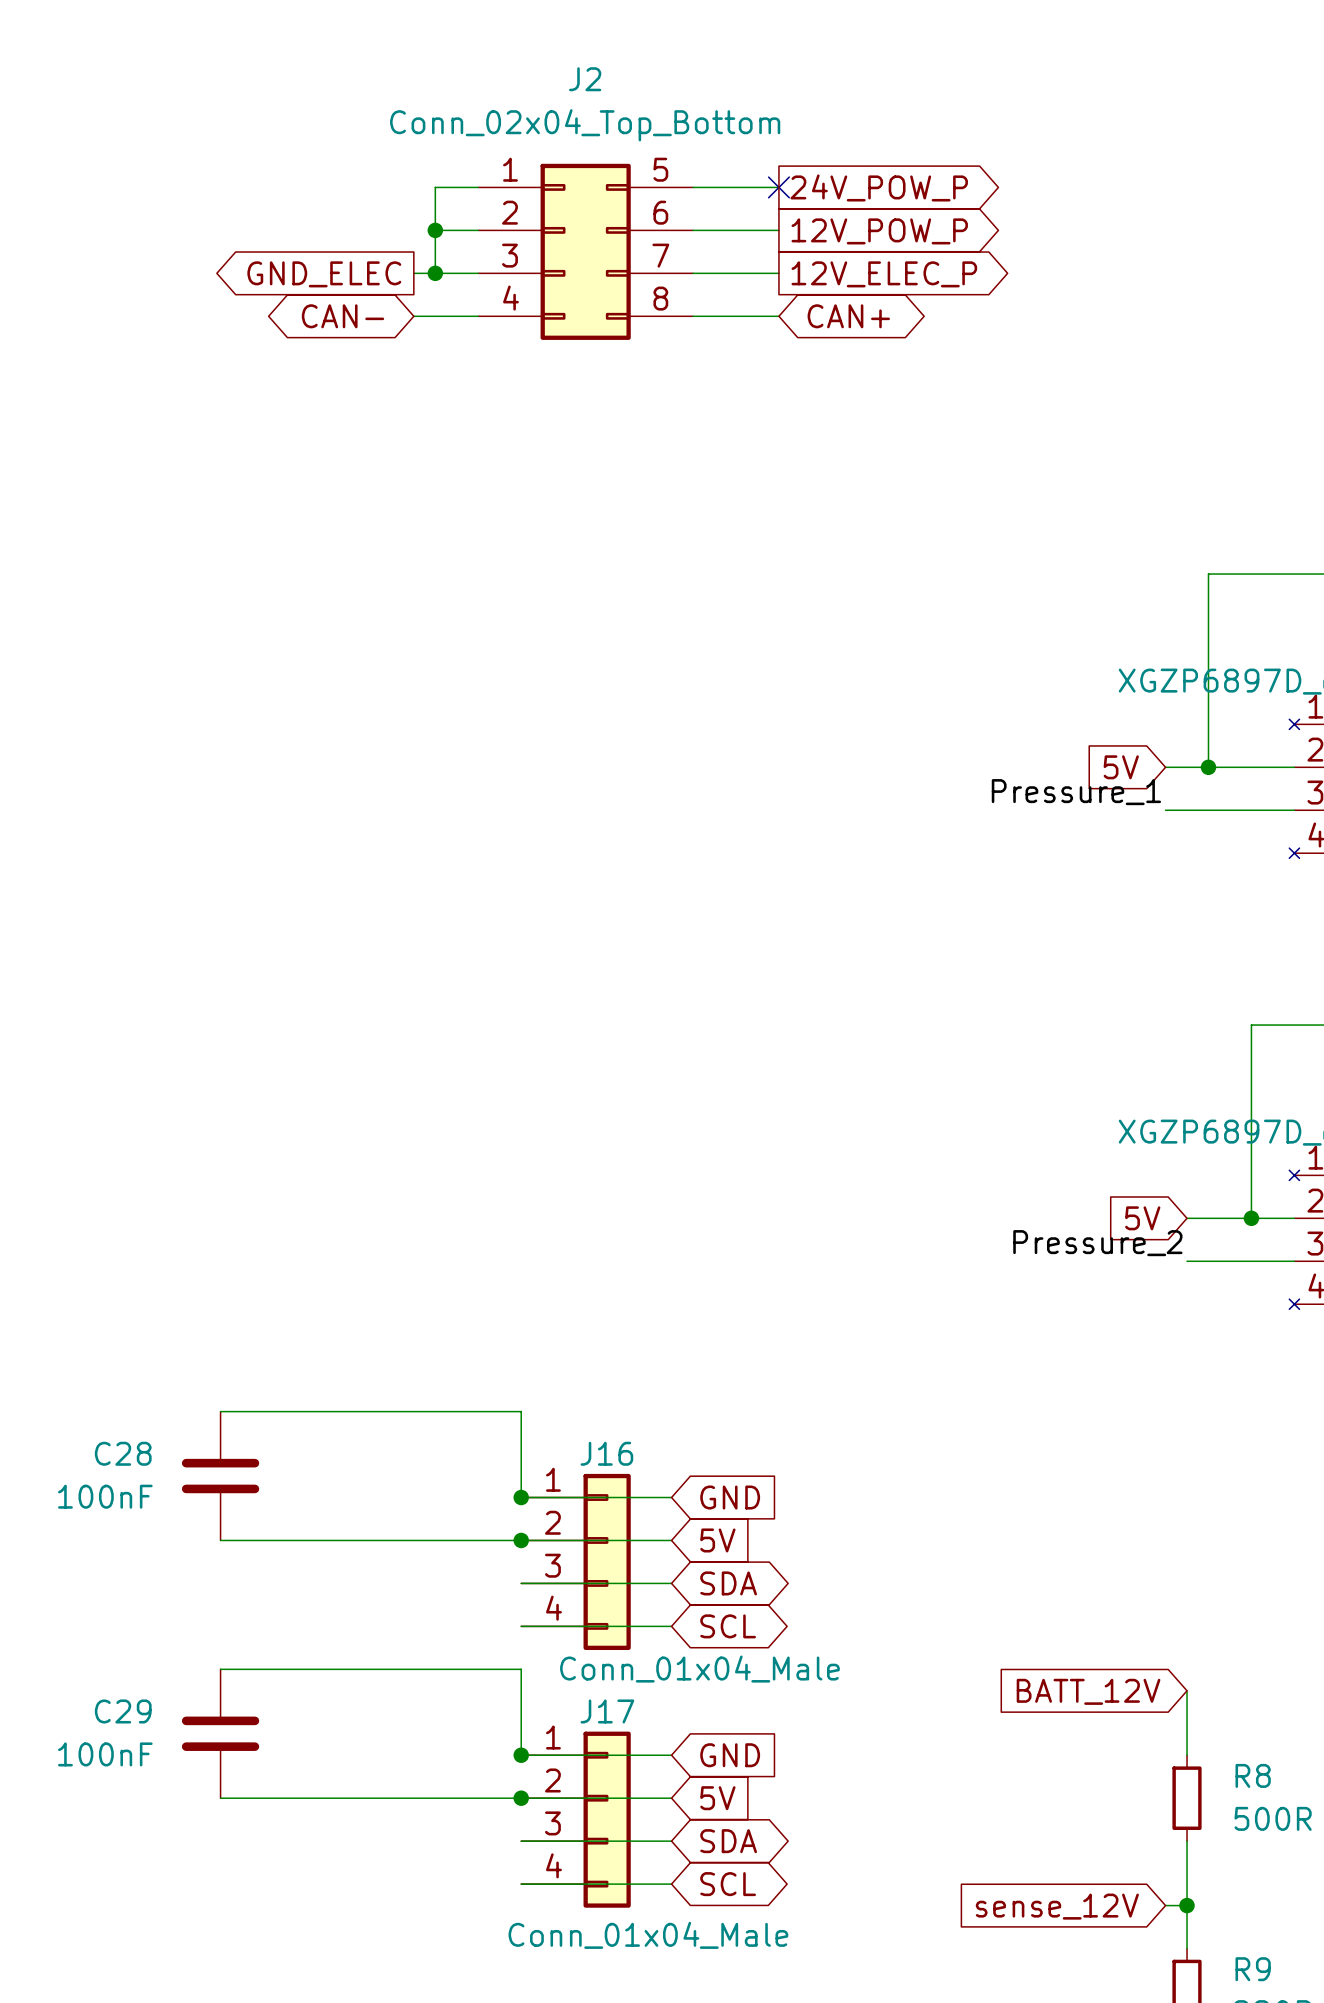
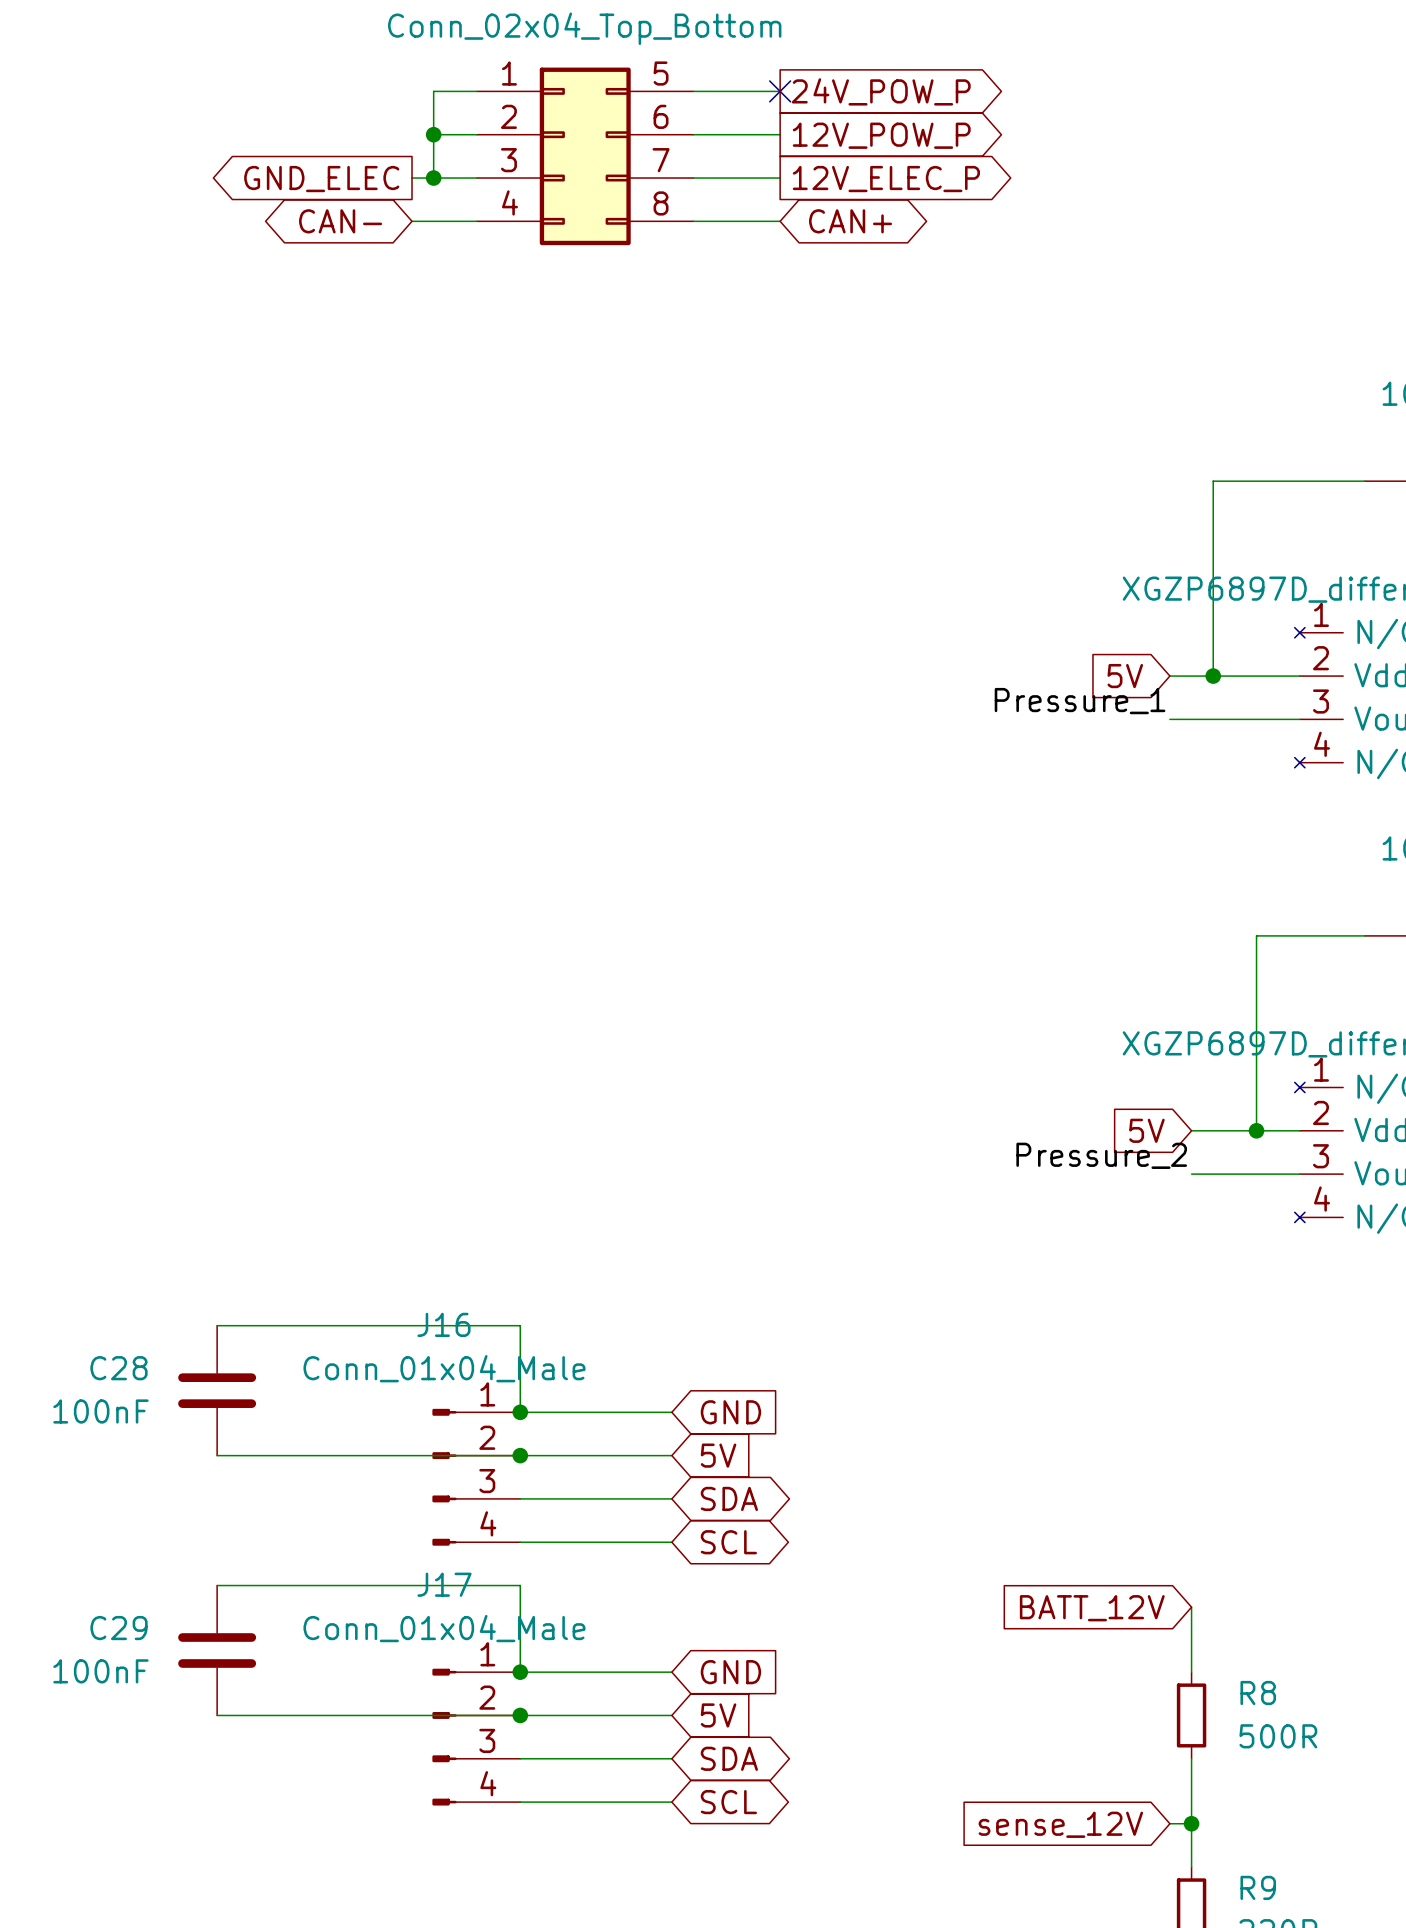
J16 name position: J16 (606, 1453) -> J16 (443, 1324)
J16 symbol: [521, 1473, 631, 1651] -> [432, 1408, 521, 1546]
J16 value position: Conn_01x04_Male (699, 1669) -> Conn_01x04_Male (444, 1368)
J17 name position: J17 (607, 1711) -> J17 (444, 1584)
J17 symbol: [521, 1731, 631, 1908] -> [432, 1668, 521, 1806]
J17 value position: Conn_01x04_Male (648, 1935) -> Conn_01x04_Male (444, 1628)

